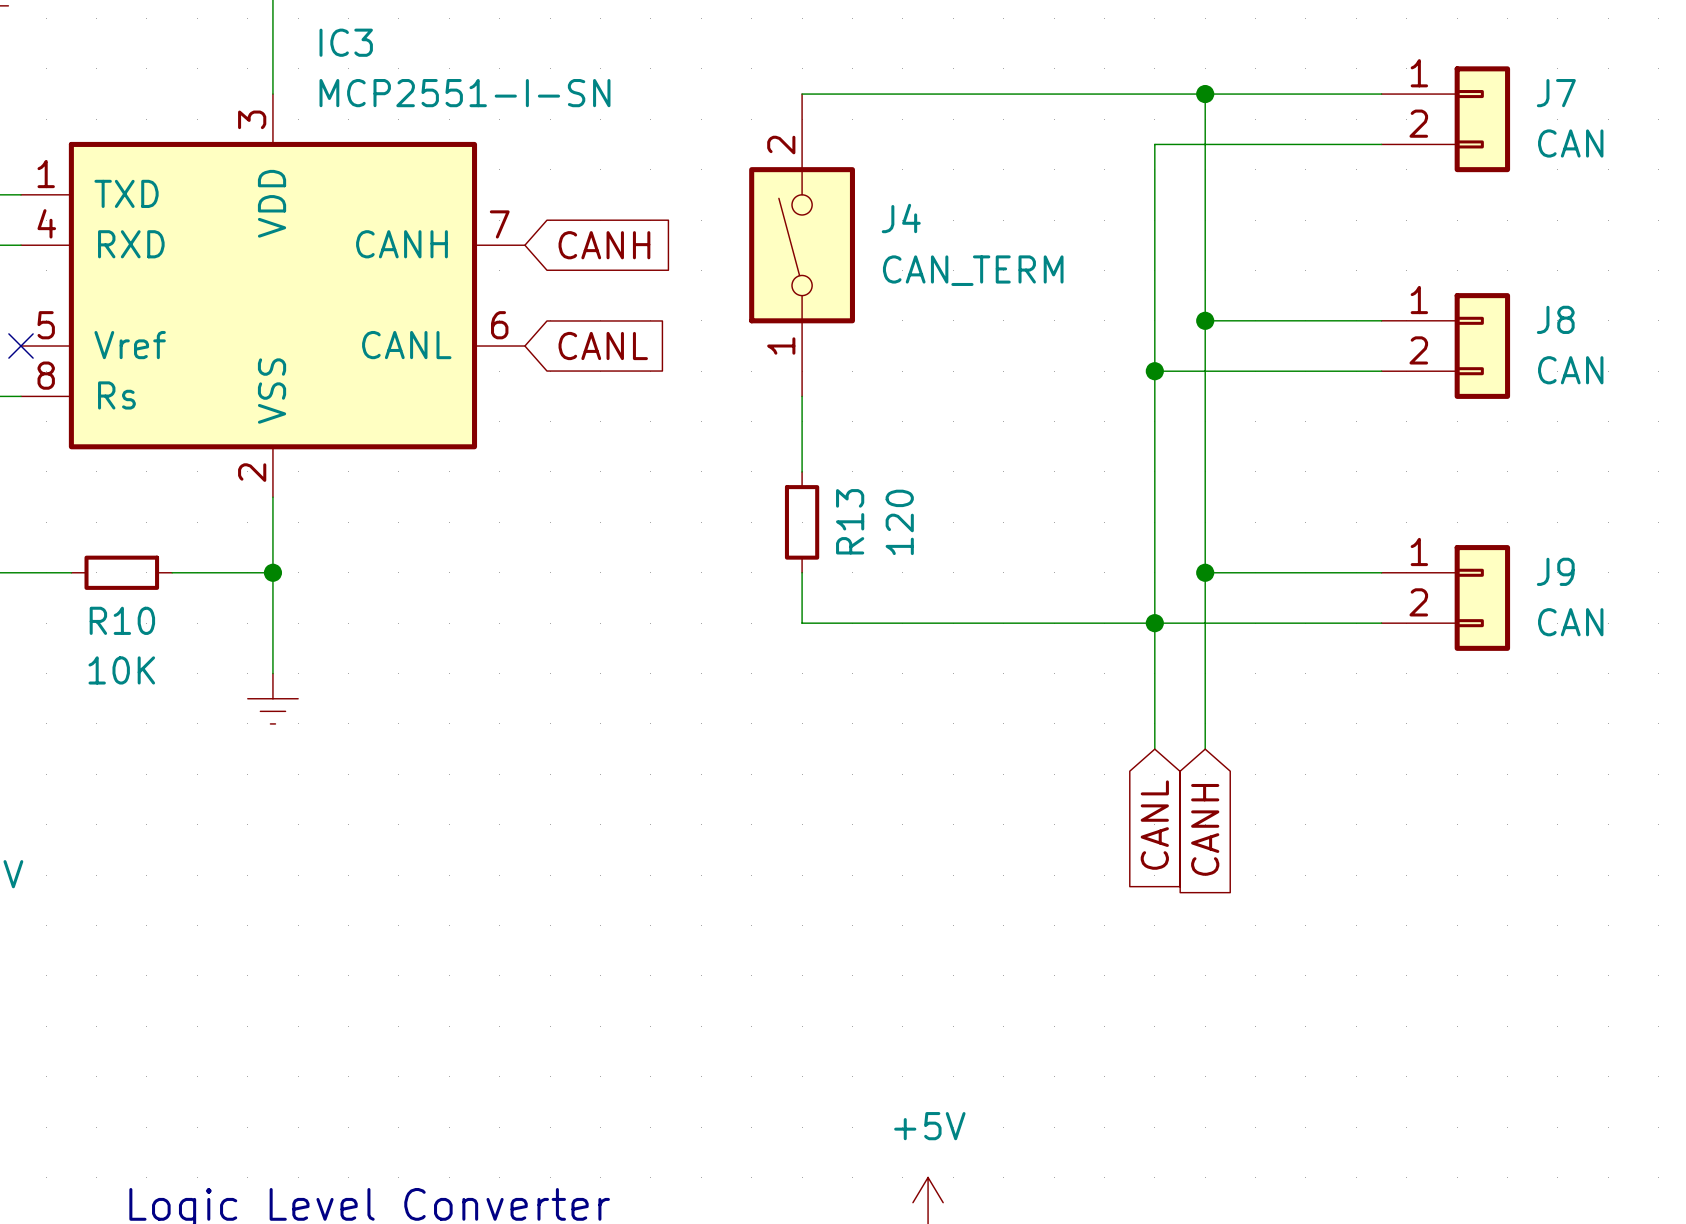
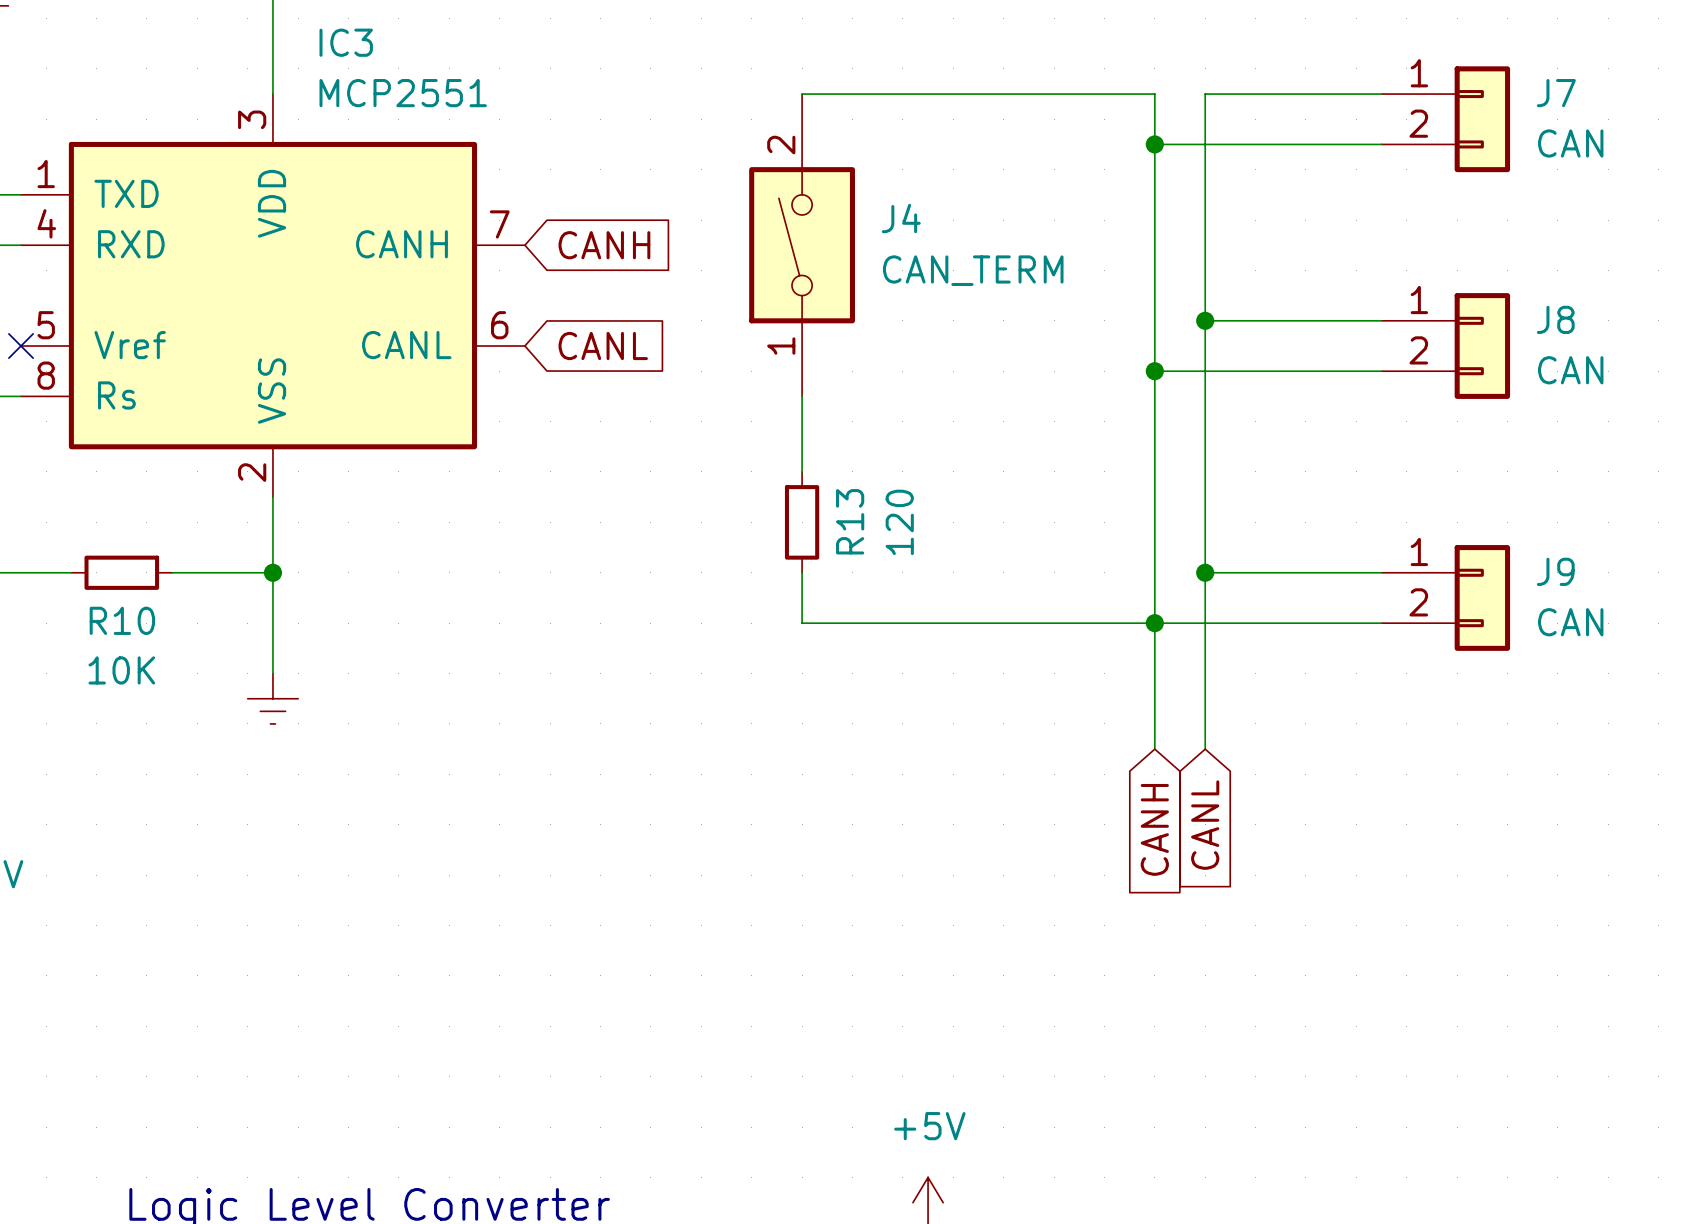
IC3 value: MCP2551-I-SN (464, 93) -> MCP2551 (403, 93)
wire: (1154, 94) (1205, 94) -> (1154, 94) (1154, 144)
junction position: (1205, 94) -> (1154, 144)
global label: CANL (1154, 825) -> CANH (1154, 829)
global label: CANH (1205, 829) -> CANL (1205, 825)

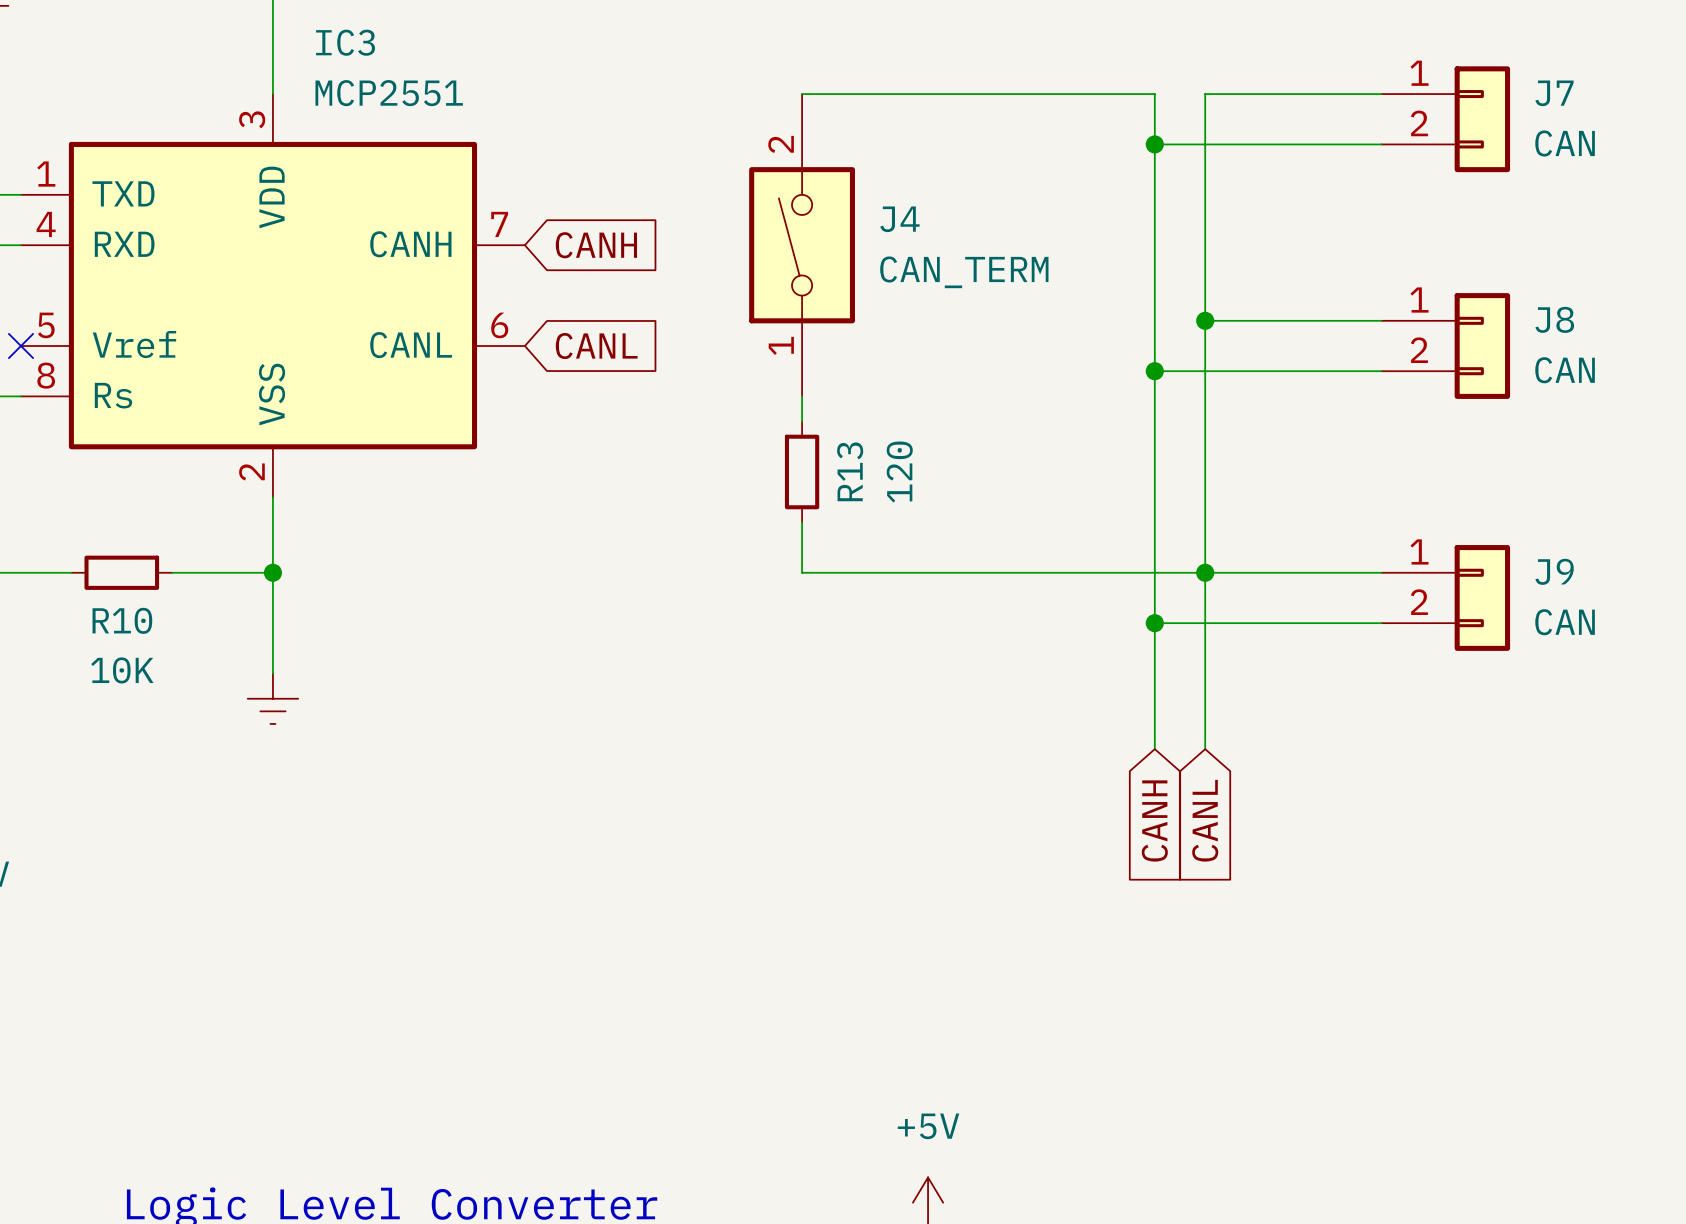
wire: (802, 421) (802, 471) -> none
wire: none -> (802, 522) (802, 572) (1205, 572)
R13 position: (802, 522) -> (802, 471)
wire: (802, 572) (802, 623) (1154, 623) -> none

